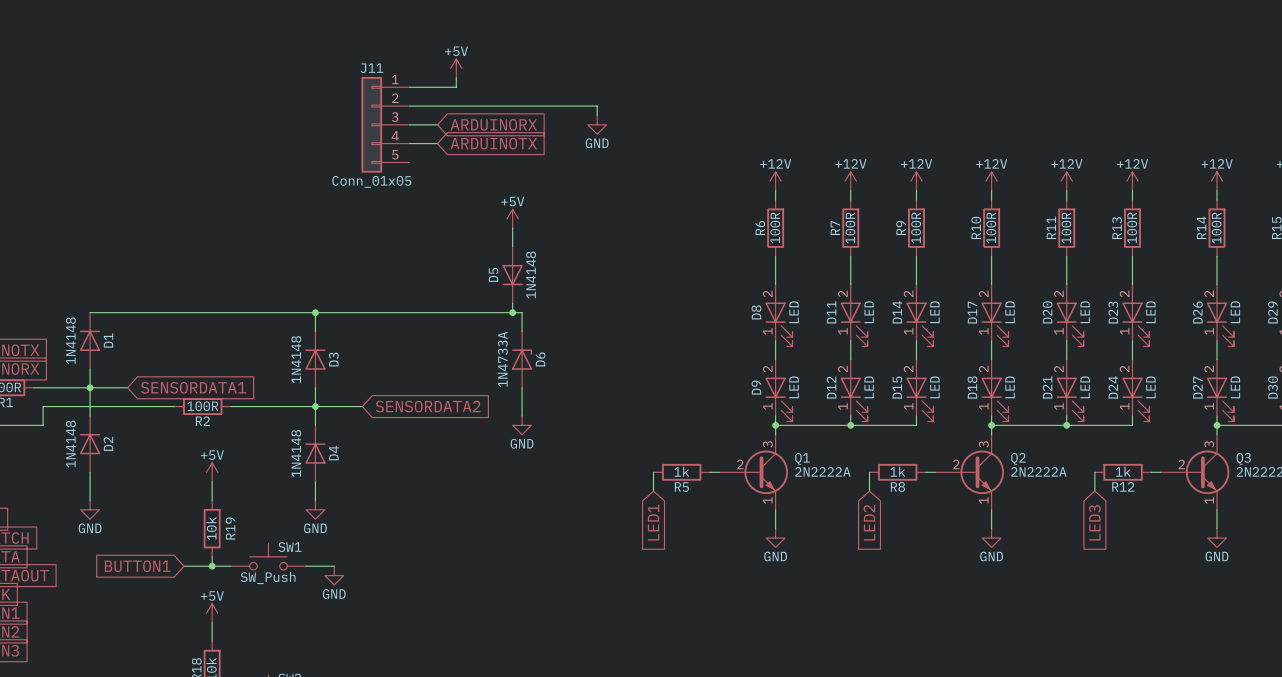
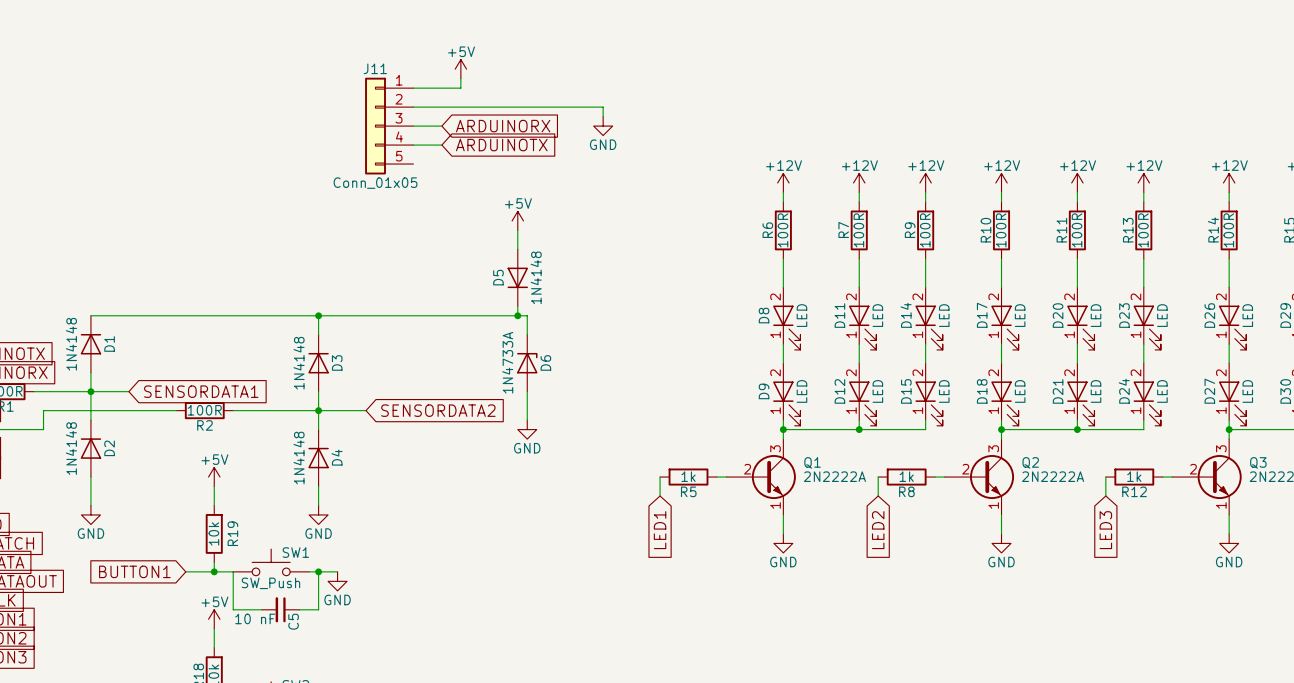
wire: none -> (233, 571) (233, 609) (261, 609)
wire: none -> (318, 571) (318, 609) (299, 609)
junction: none -> (318, 571)
C5: none -> 10 nF (280, 609)

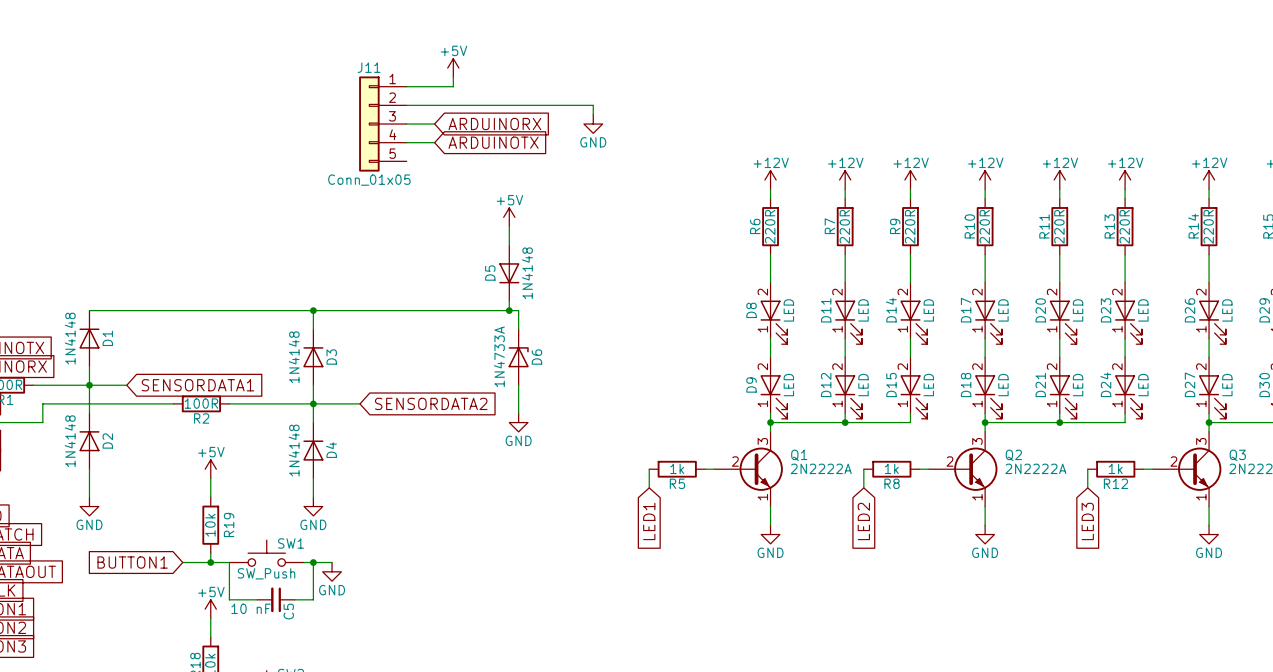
R6 value: 100R (783, 230) -> 220R (770, 226)
R7 value: 100R (858, 230) -> 220R (844, 226)
R9 value: 100R (925, 230) -> 220R (910, 226)
R10 value: 100R (1001, 230) -> 220R (984, 226)
R11 value: 100R (1077, 230) -> 220R (1059, 226)
R13 value: 100R (1143, 230) -> 220R (1124, 226)
R14 value: 100R (1228, 230) -> 220R (1208, 226)

